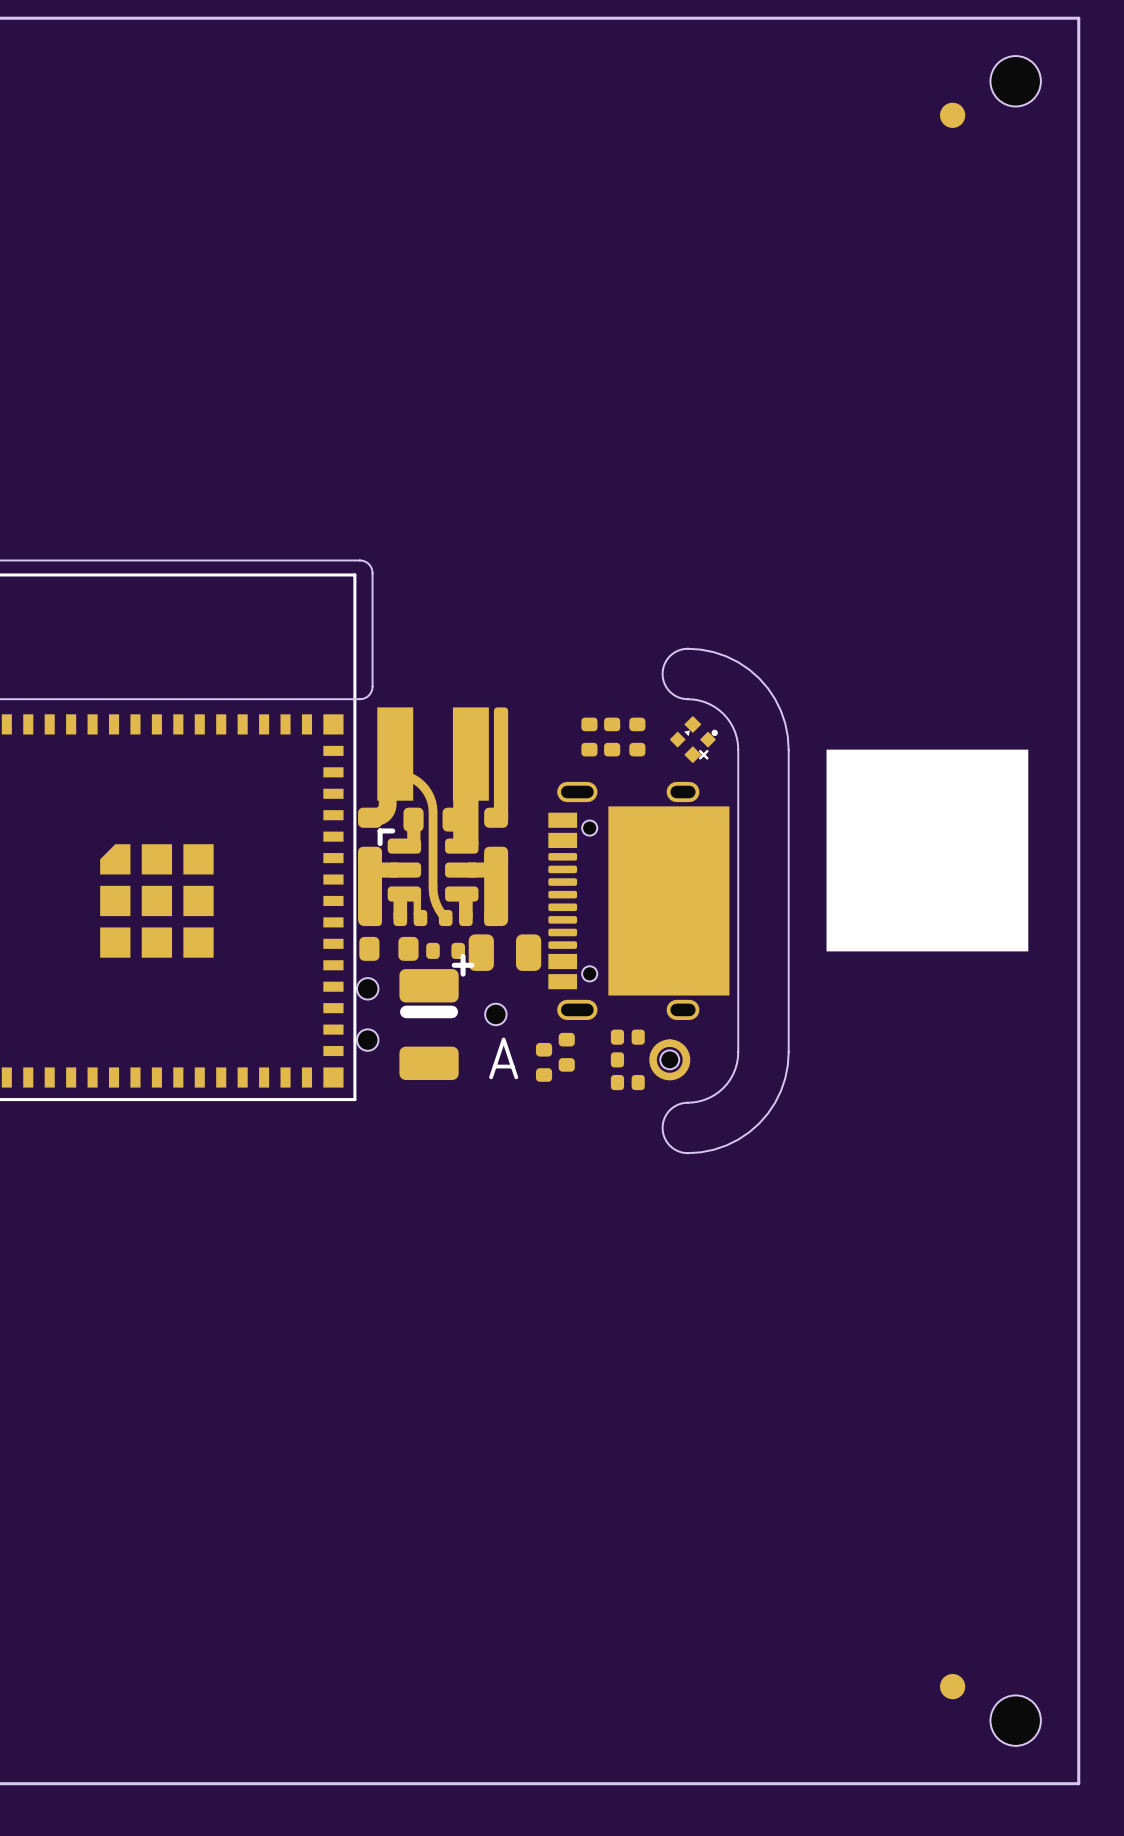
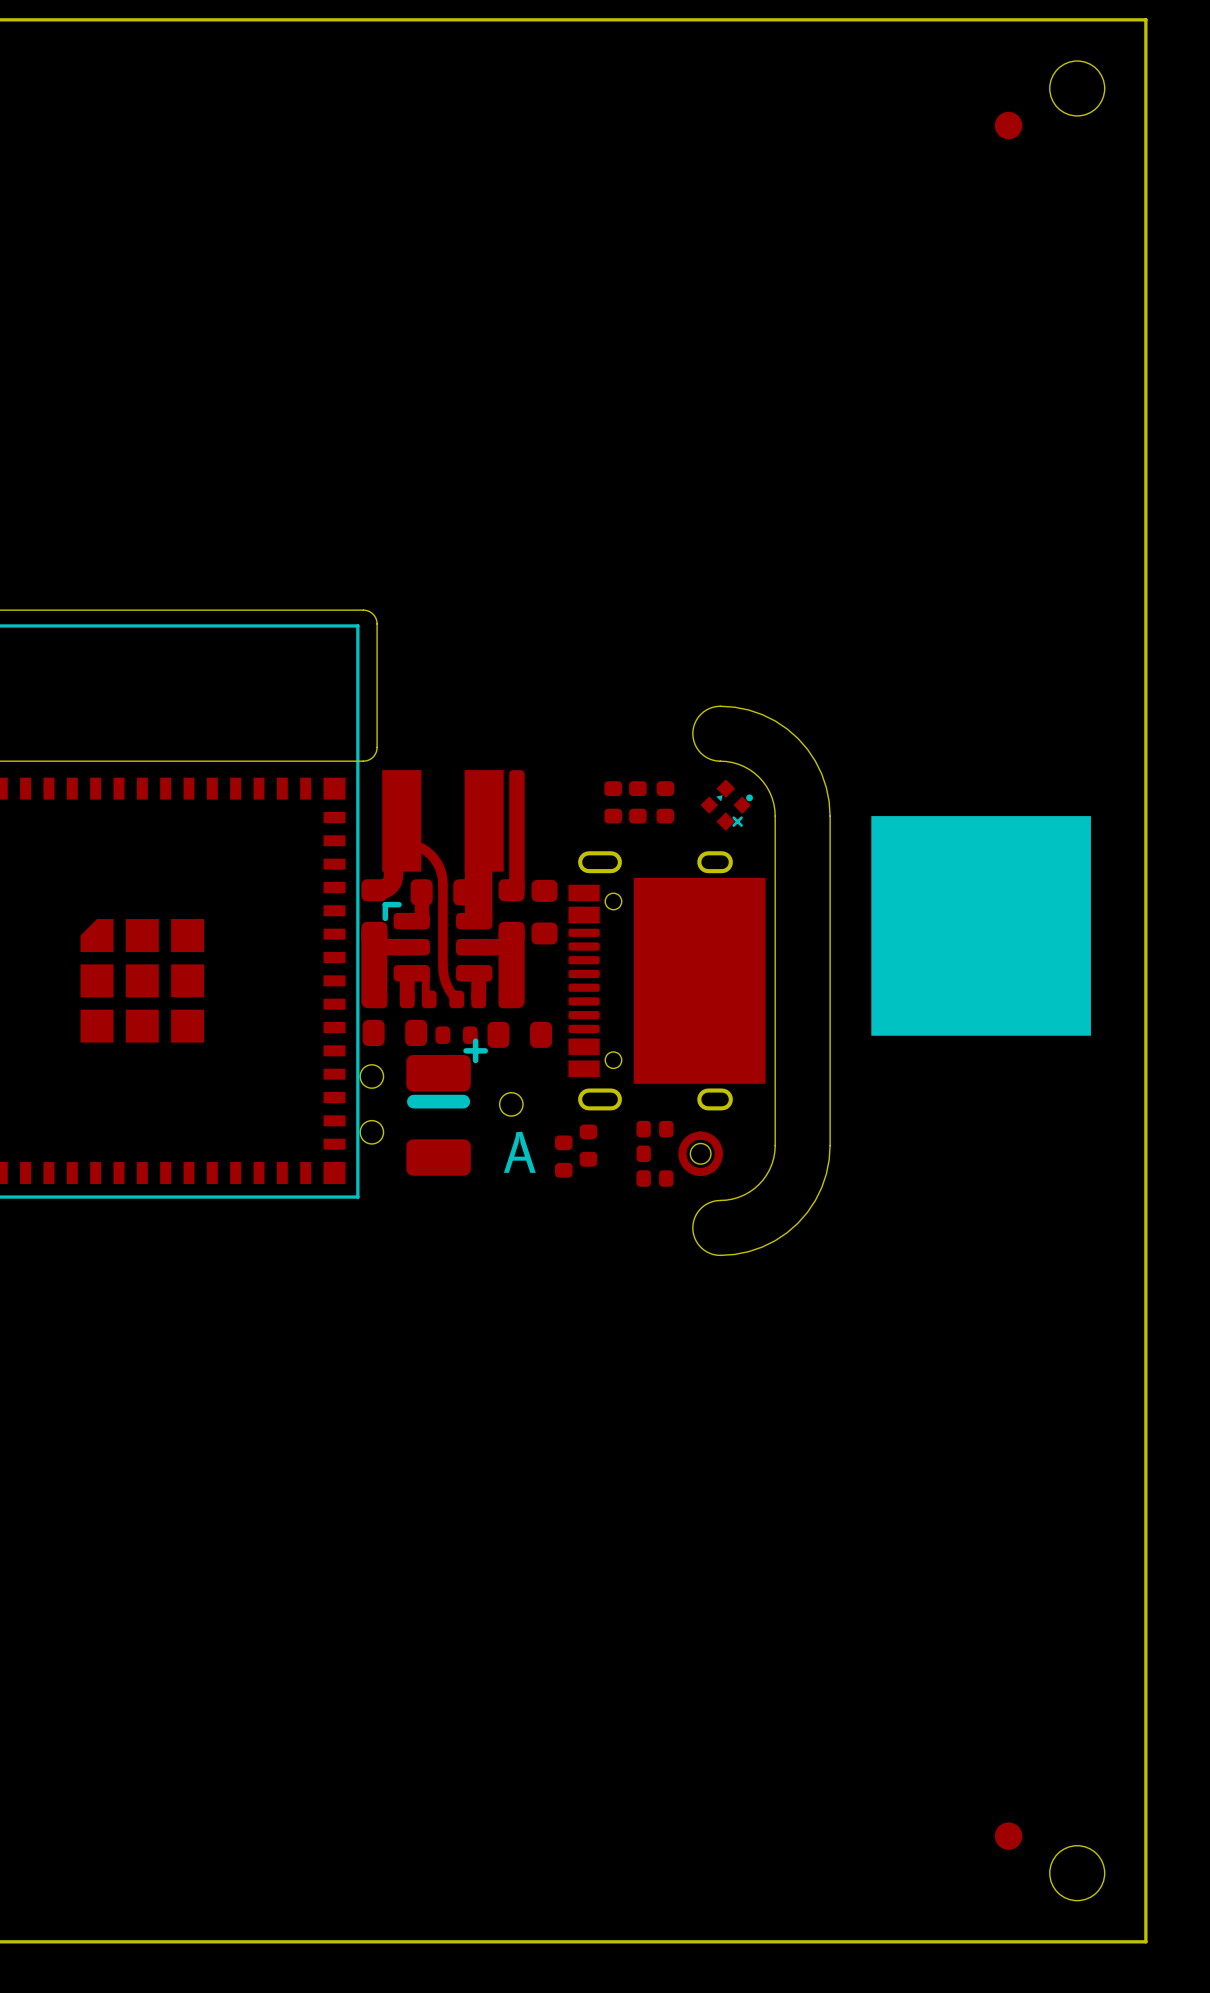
part: none -> (544, 912)
part footprint: [468, 934, 542, 971] -> [487, 1021, 553, 1048]

